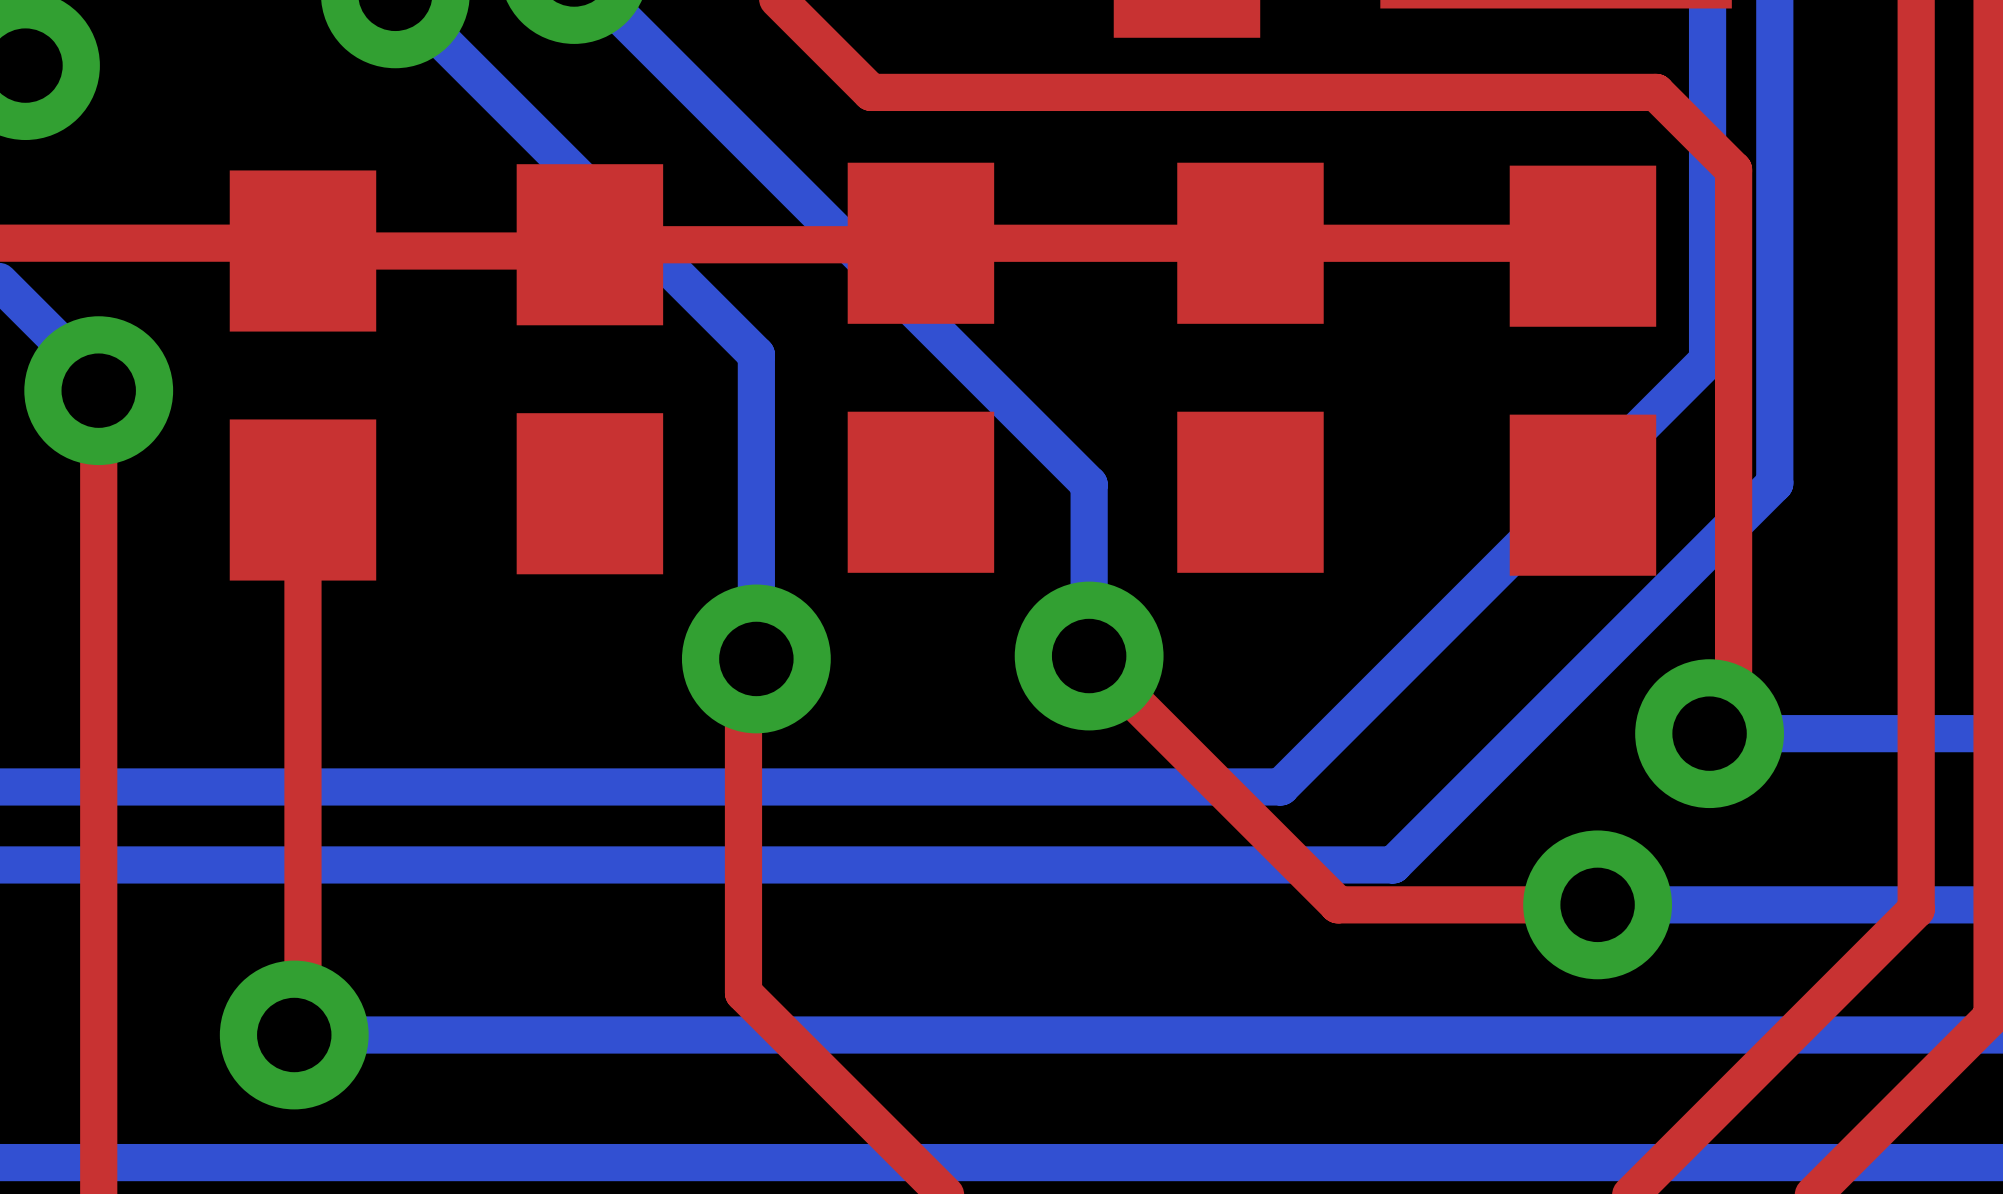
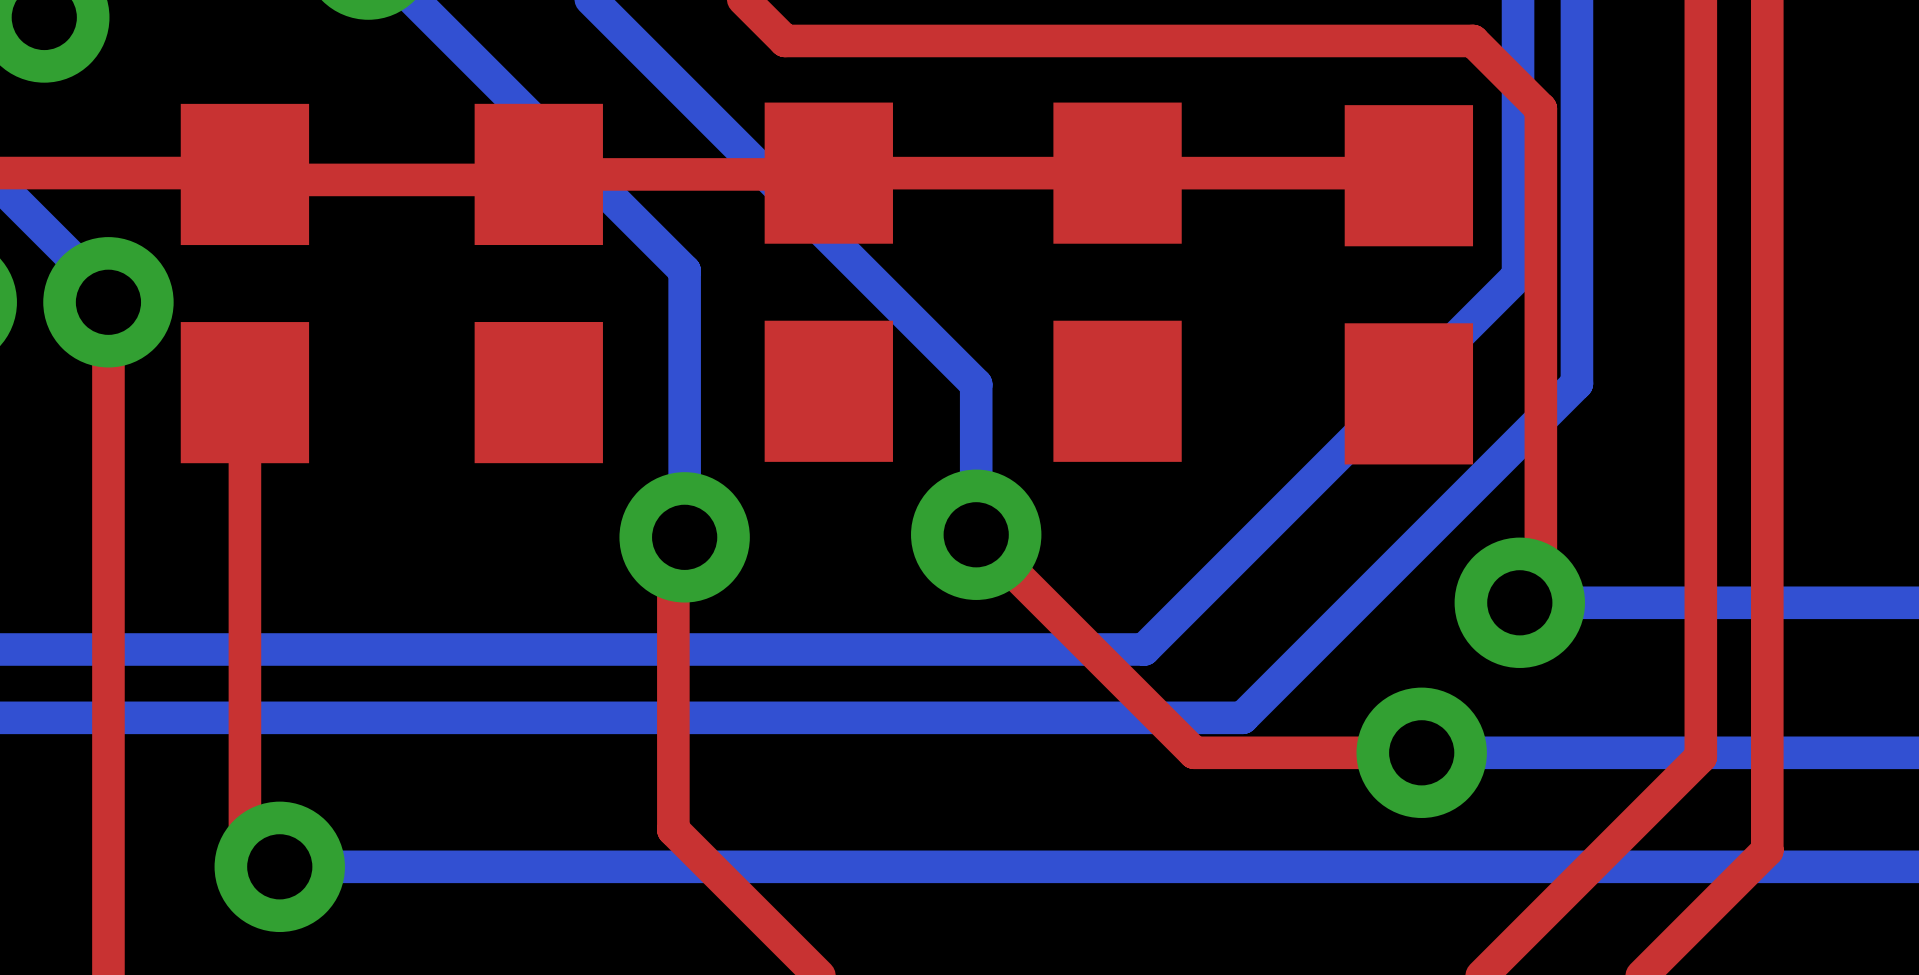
part position: (302, 375) -> (244, 283)
top track: (302, 500) (302, 1026) (294, 1035) -> (244, 392) (244, 831) (279, 866)

